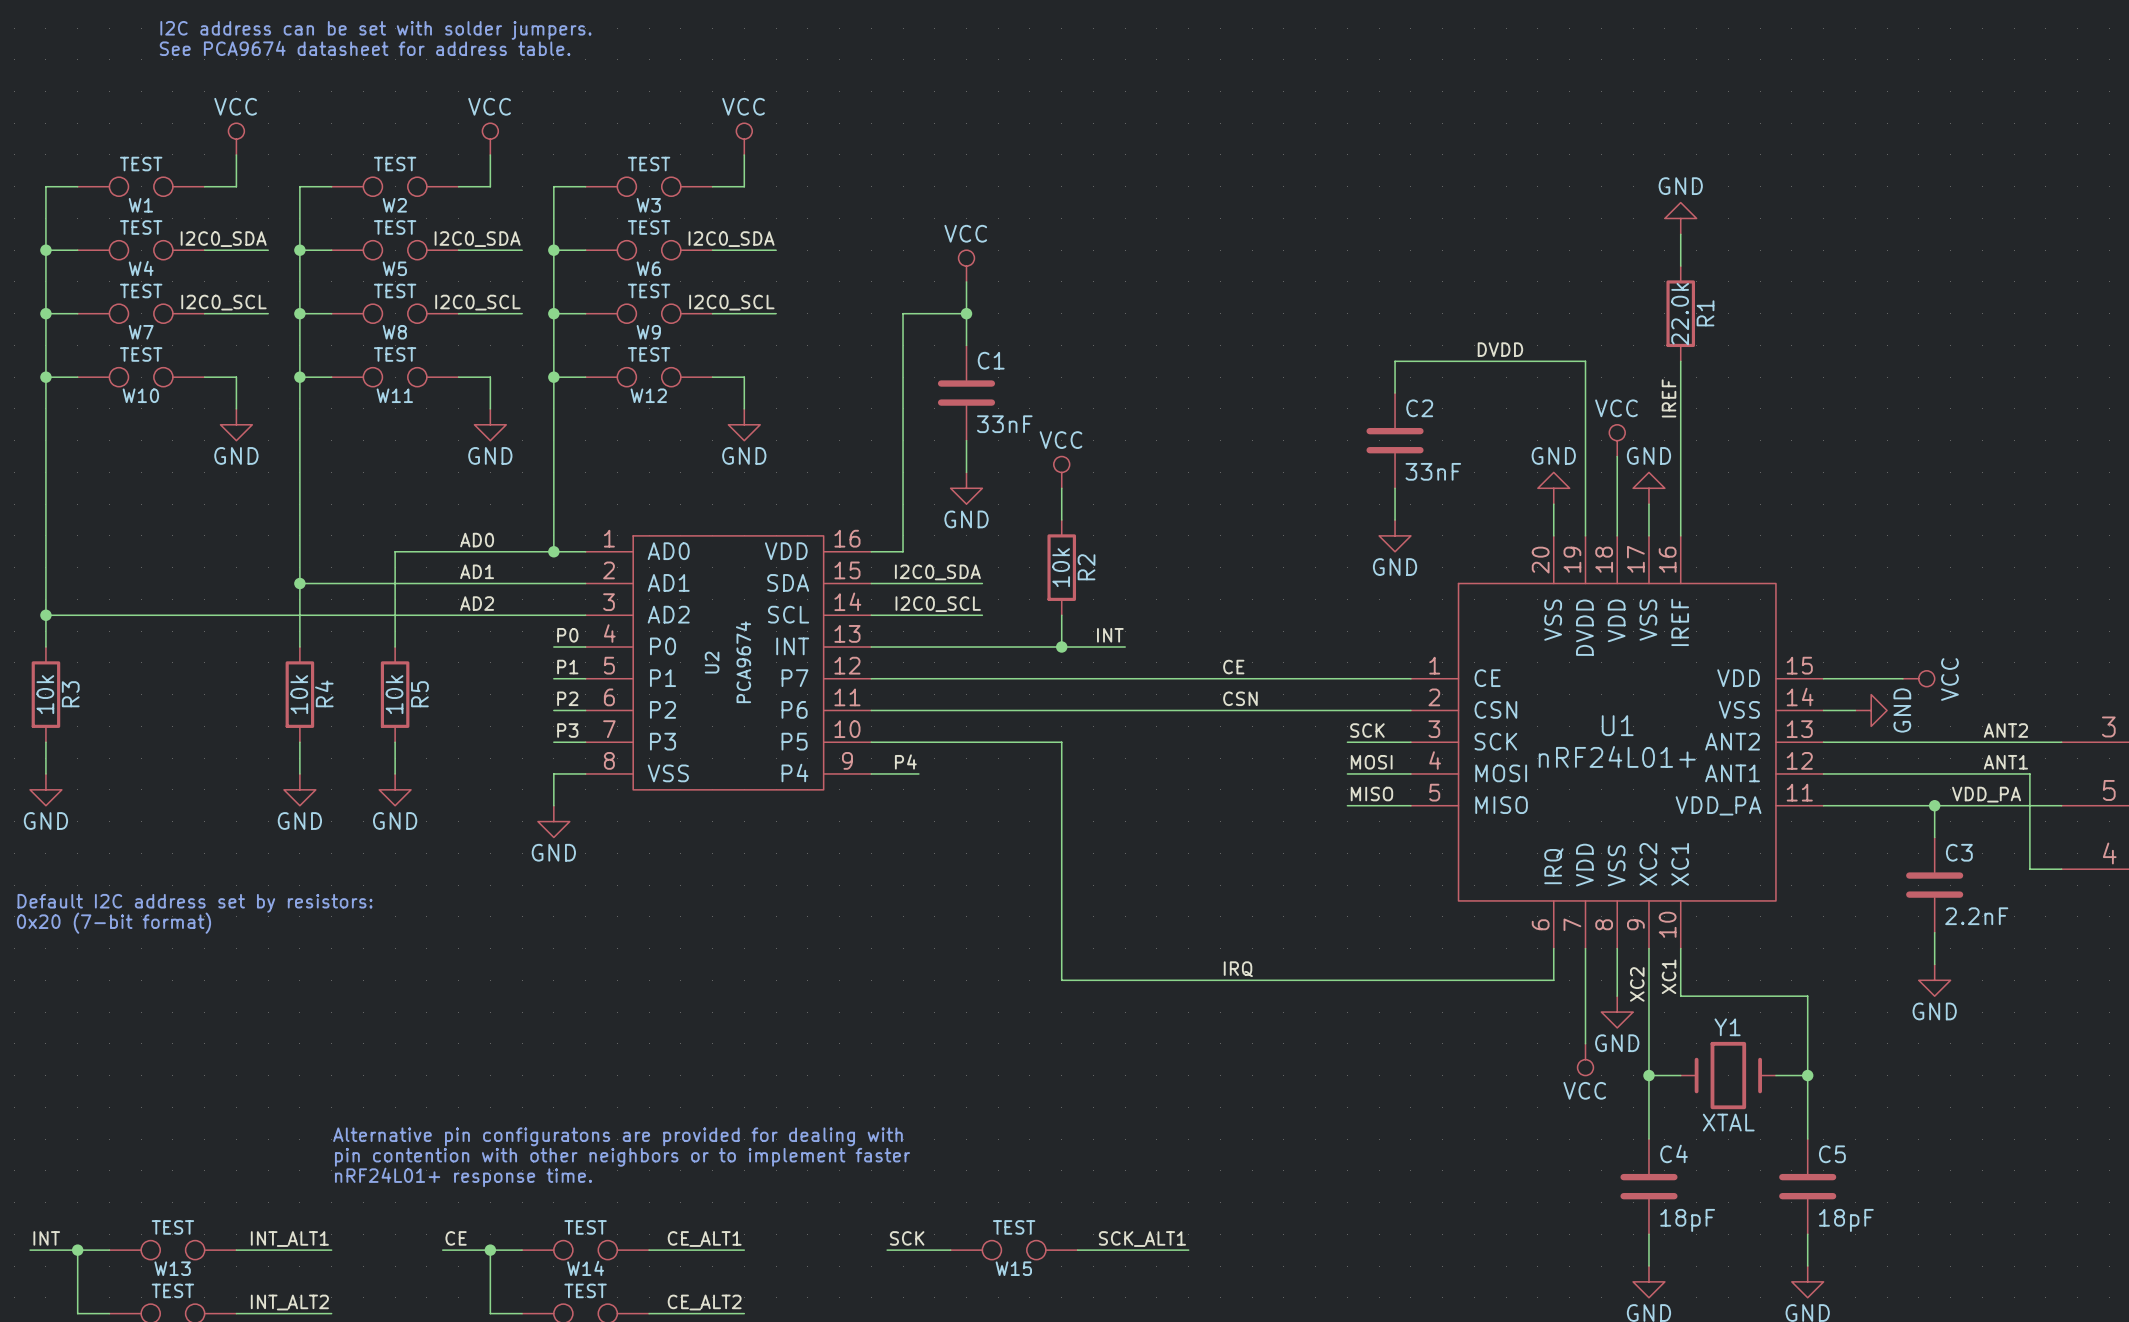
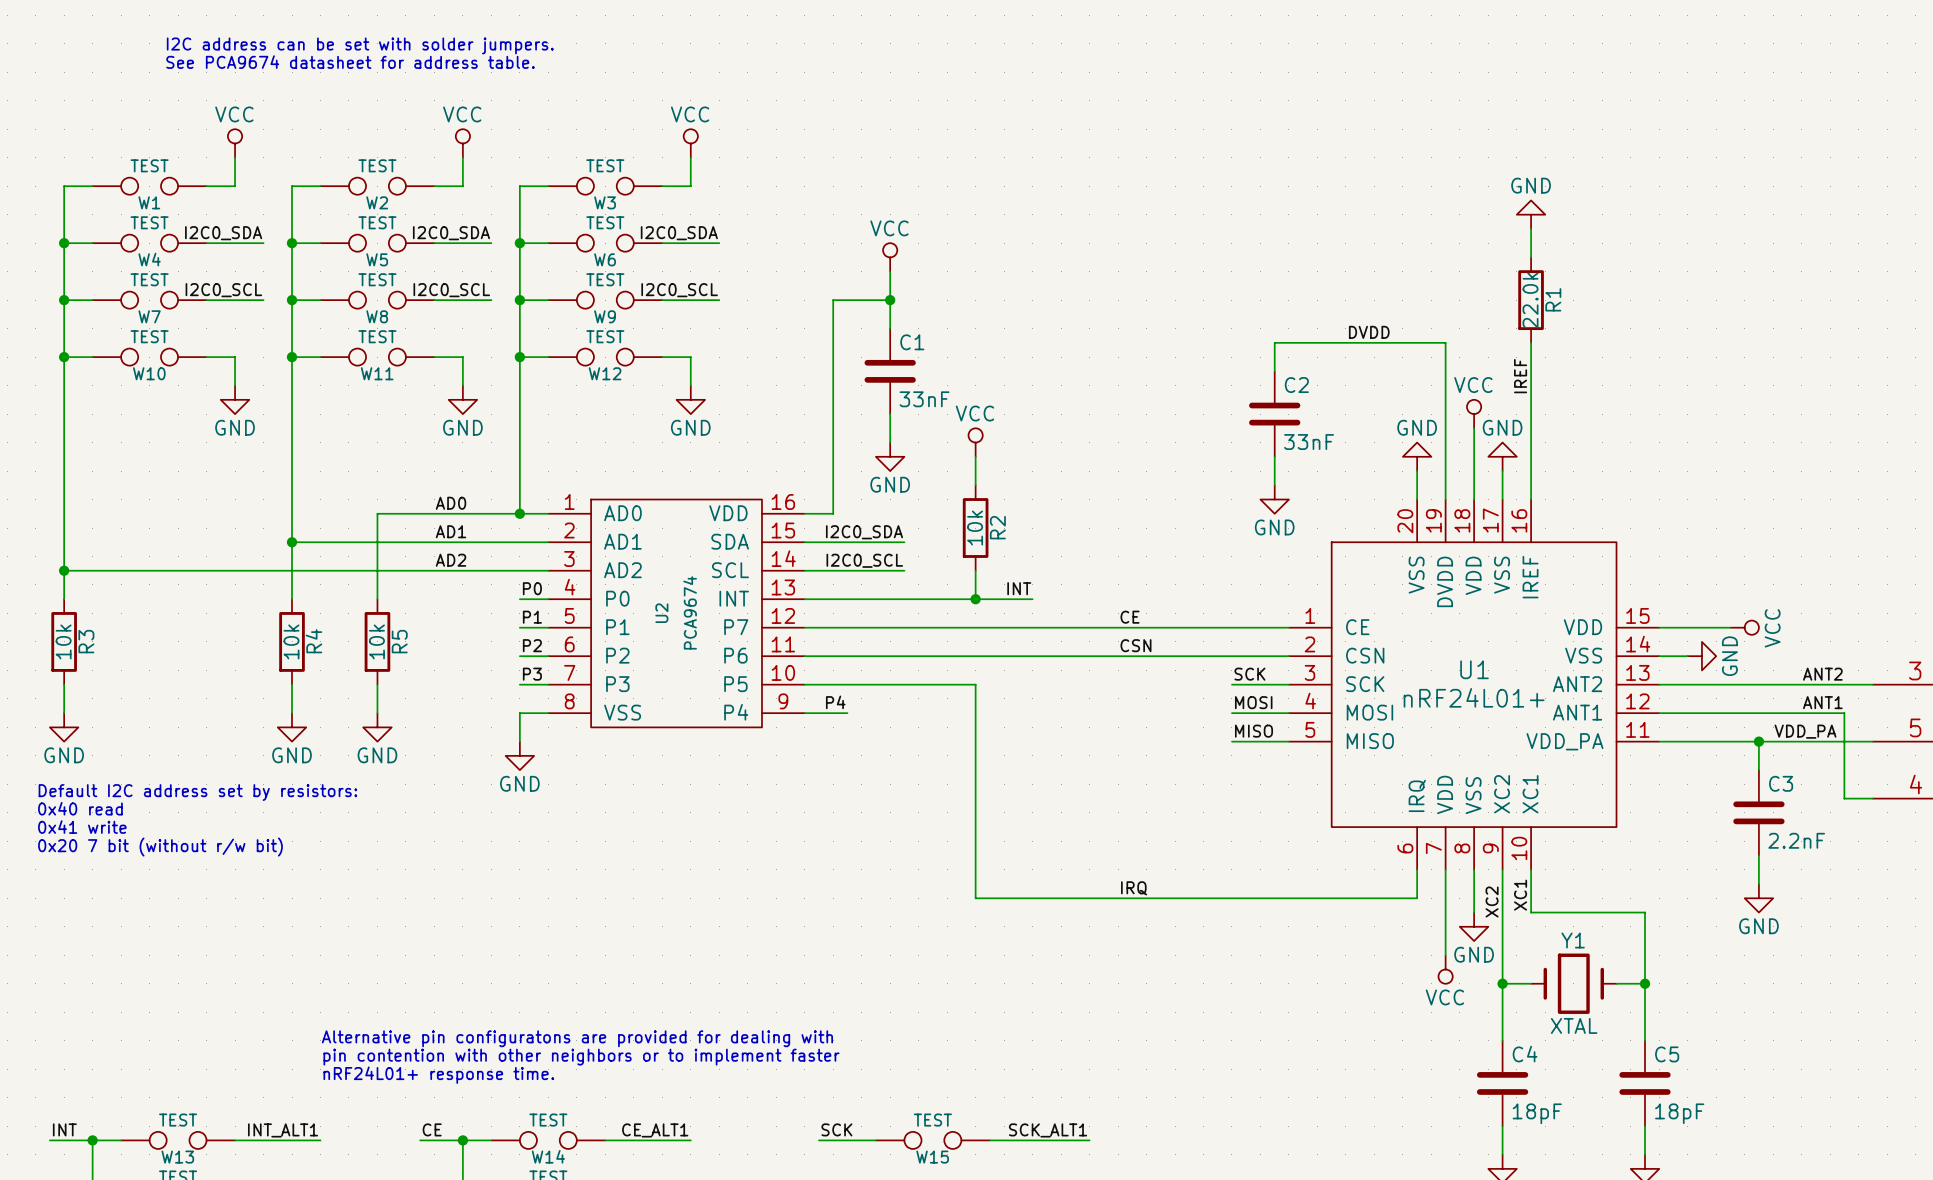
text: none -> Default I2C address set by resistors: (197, 792)
text: none -> 0x40 read (80, 808)
text: Default I2C address set by resistors: (195, 903) -> 0x41 write (82, 827)
text: 0x20 (7-bit format) (114, 923) -> 0x20 7 bit (without r/w bit) (160, 847)

